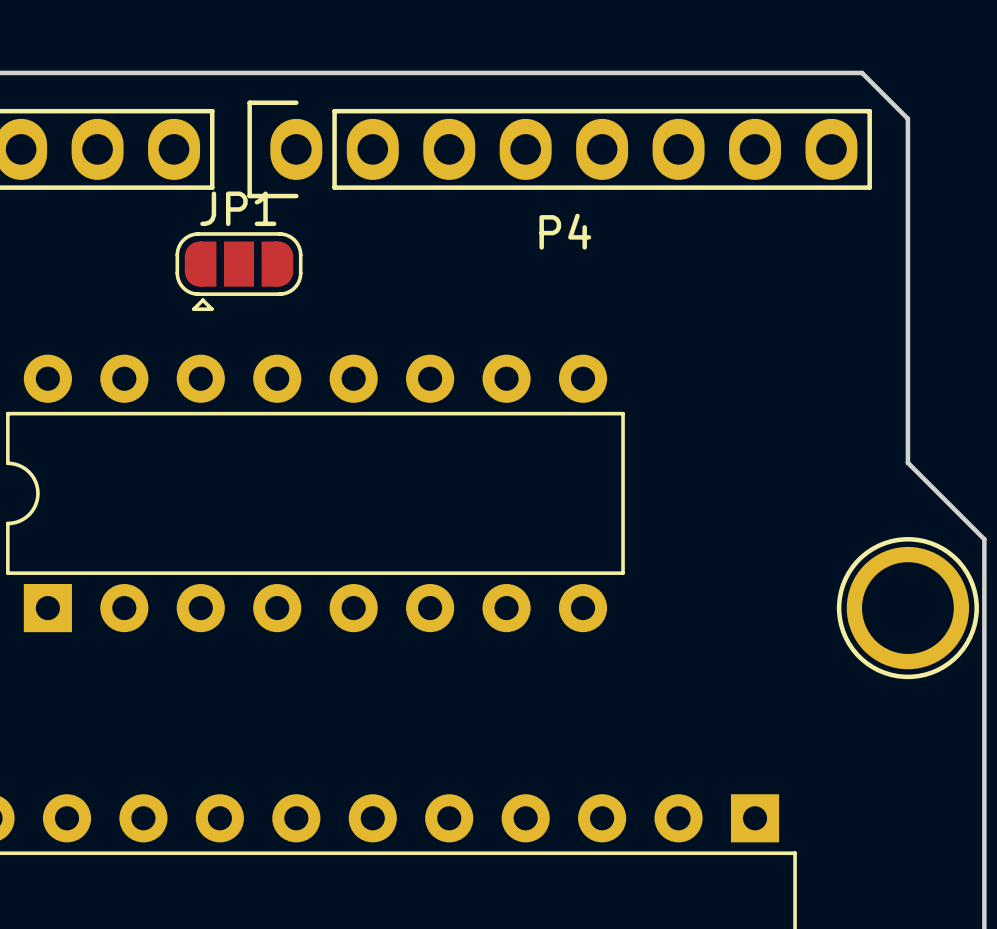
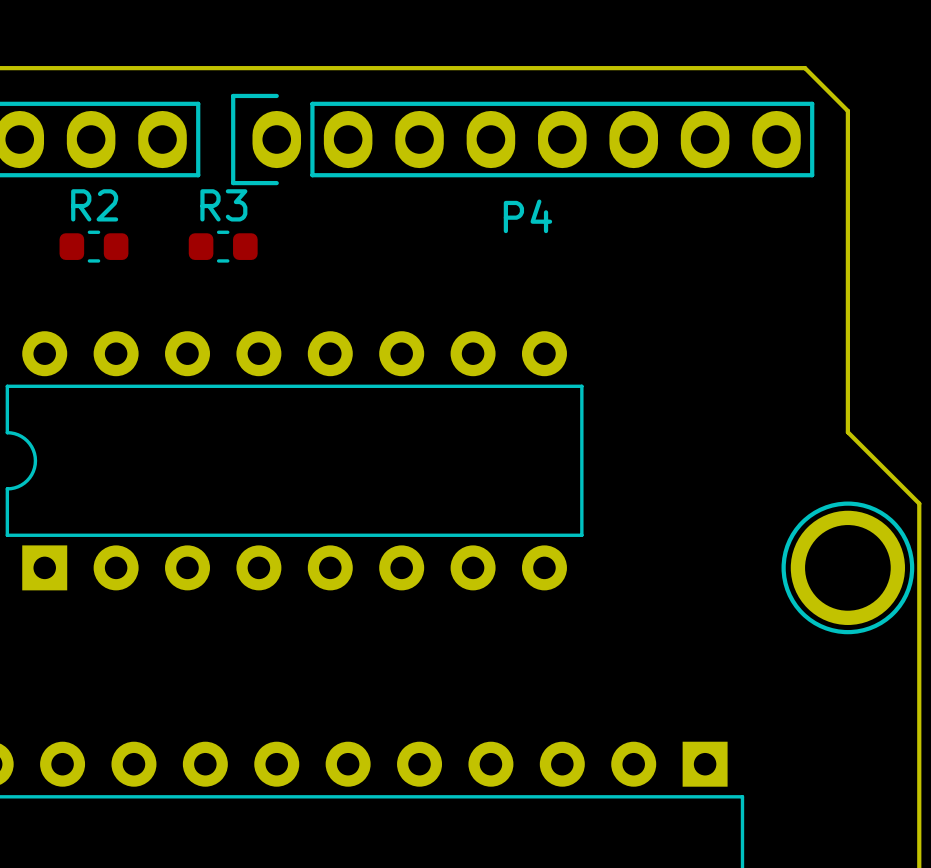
R2: none -> (93, 246)
R3: none -> (223, 246)
JP1: (239, 271) -> none

